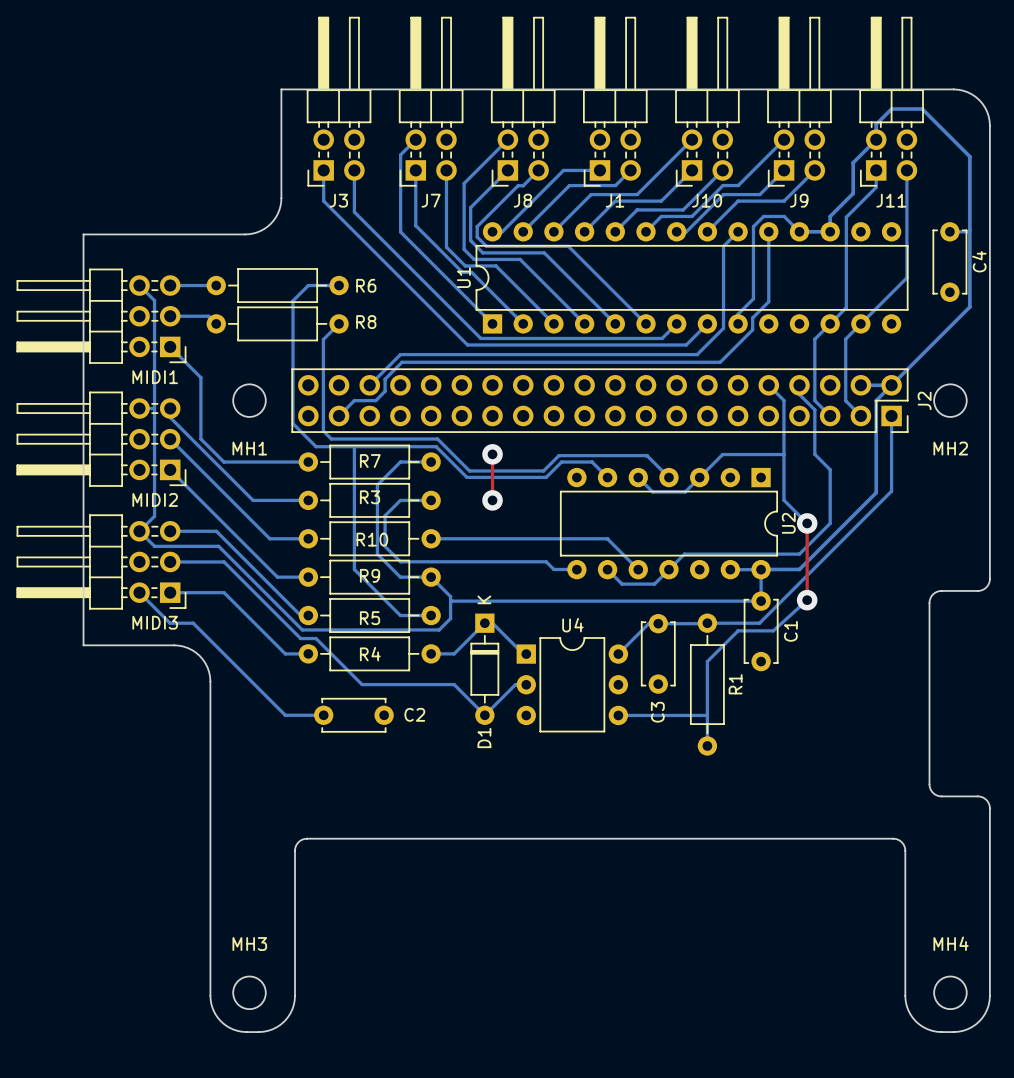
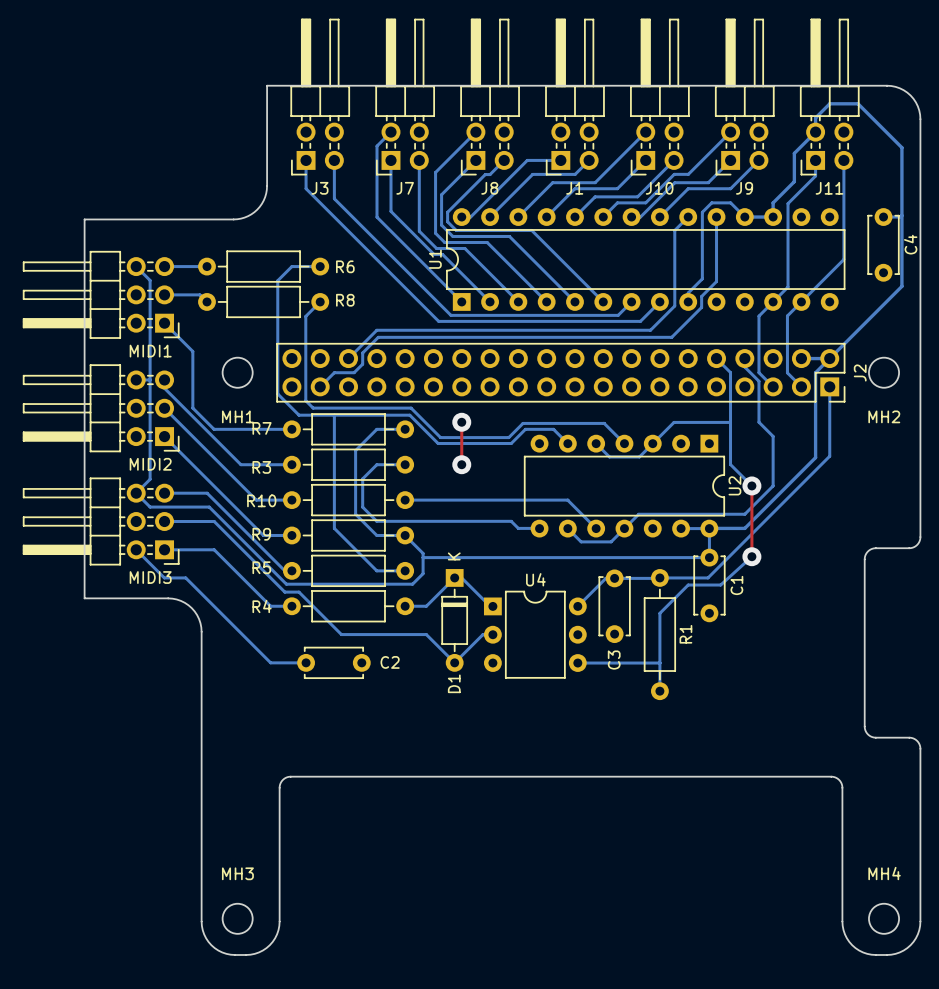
R7 name position: R7 (370, 461) -> R7 (262, 428)
R3 name position: R3 (370, 497) -> R3 (261, 467)
R10 name position: R10 (372, 539) -> R10 (261, 500)
R9 name position: R9 (370, 575) -> R9 (261, 534)
R5 name position: R5 (370, 618) -> R5 (261, 567)
R4 name position: R4 (370, 654) -> R4 (262, 606)

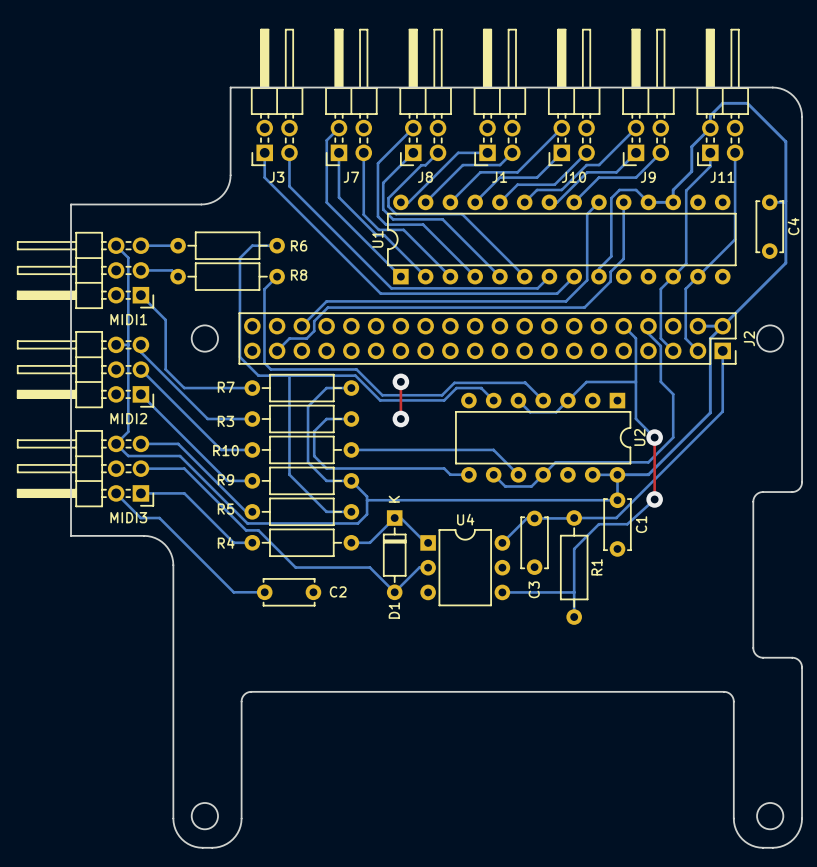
MH1 name: MH1 (237, 416) -> none
MH2 name: MH2 (884, 416) -> none
MH3 name: MH3 (237, 873) -> none
MH4 name: MH4 (884, 873) -> none

